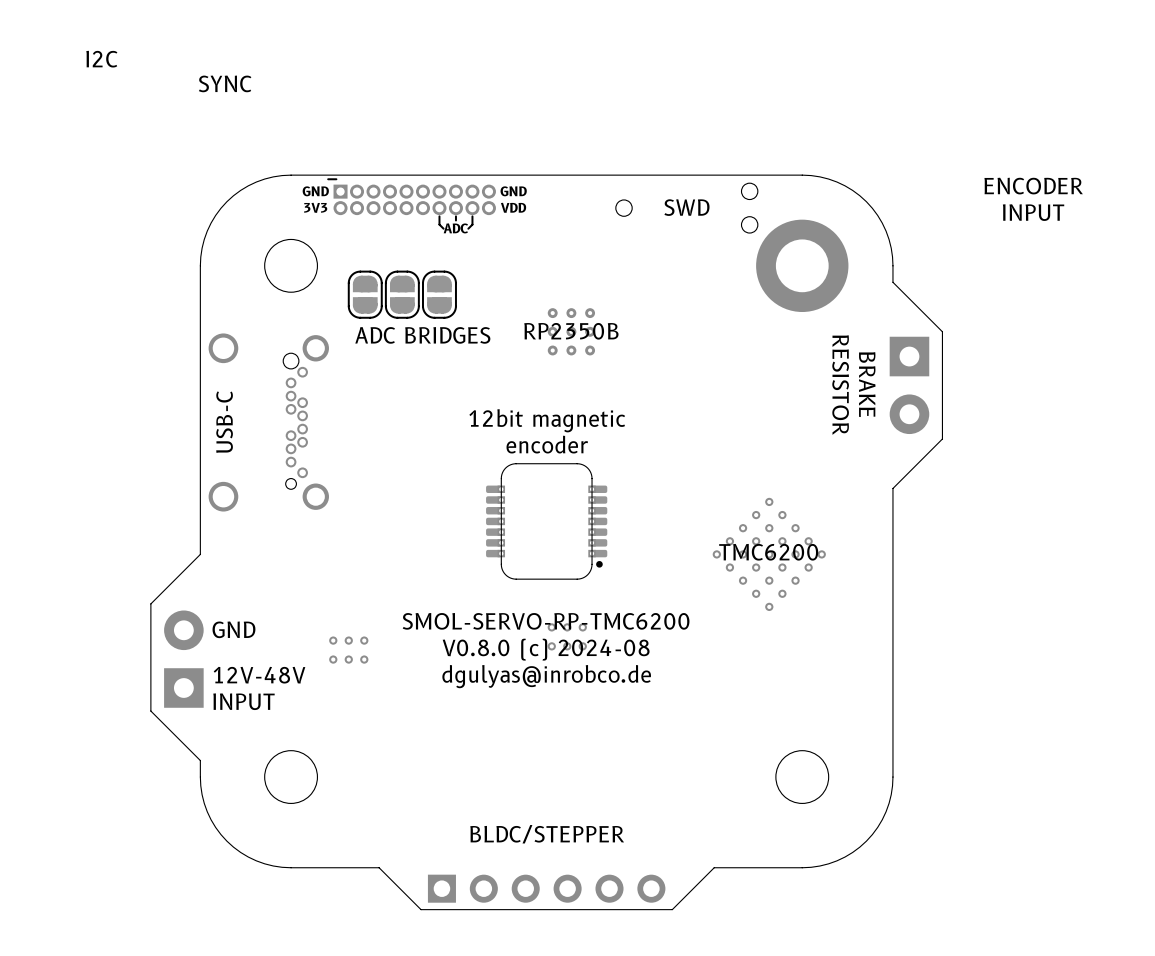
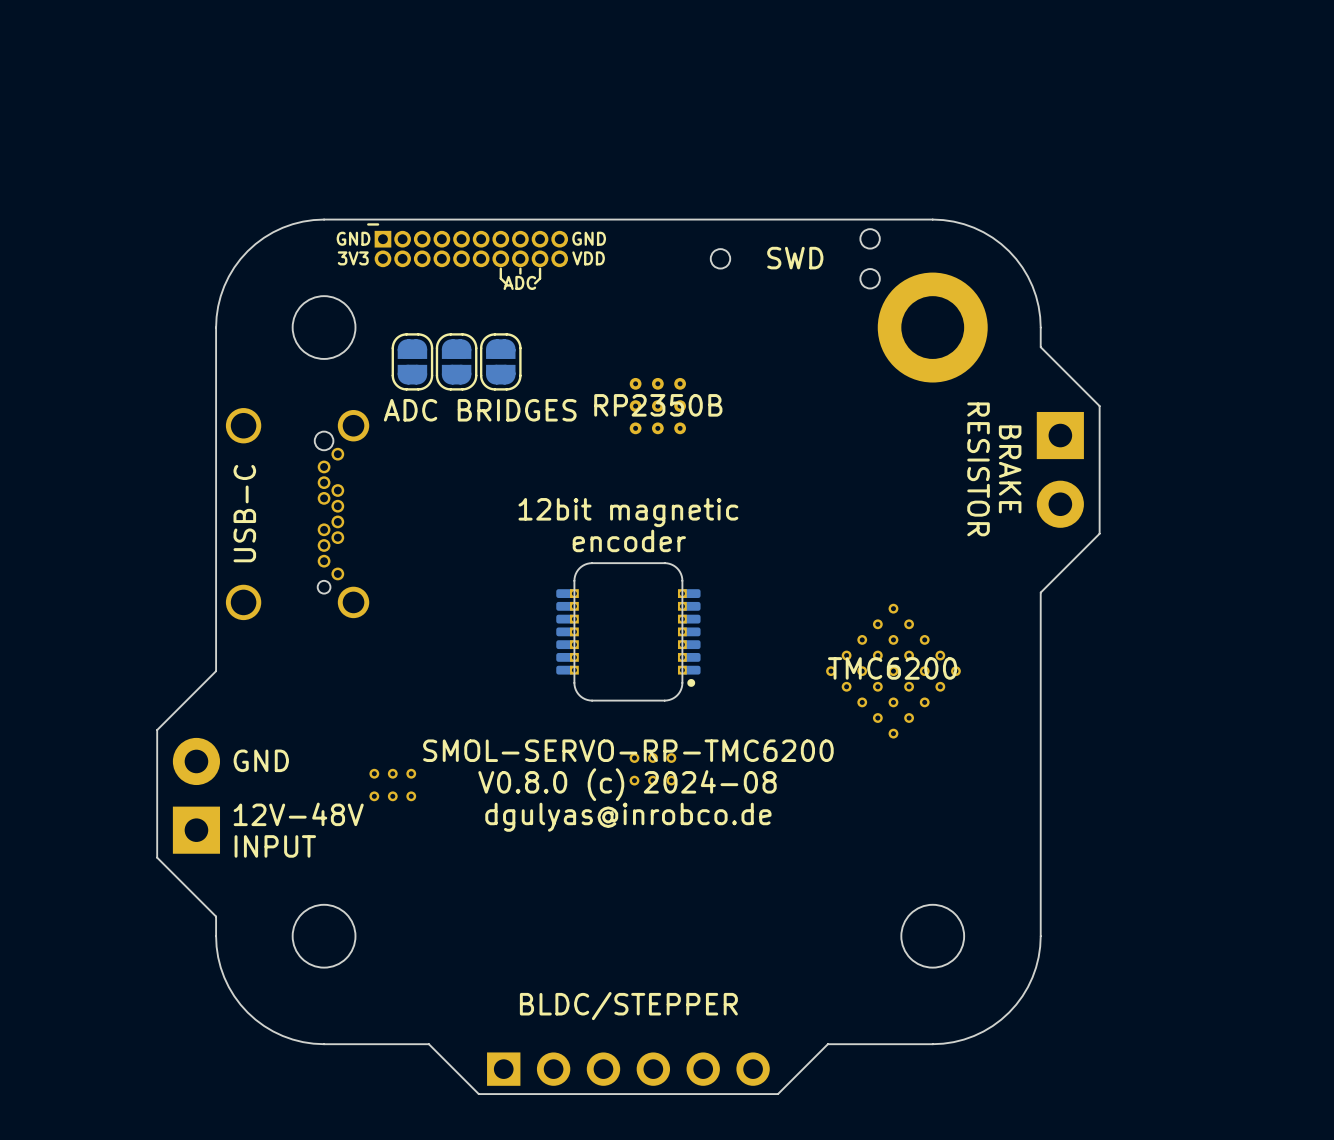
text: I2C (101, 59) -> none
text: SYNC (225, 83) -> none
text: ENCODER (1033, 186) -> none
text: INPUT (1033, 212) -> none

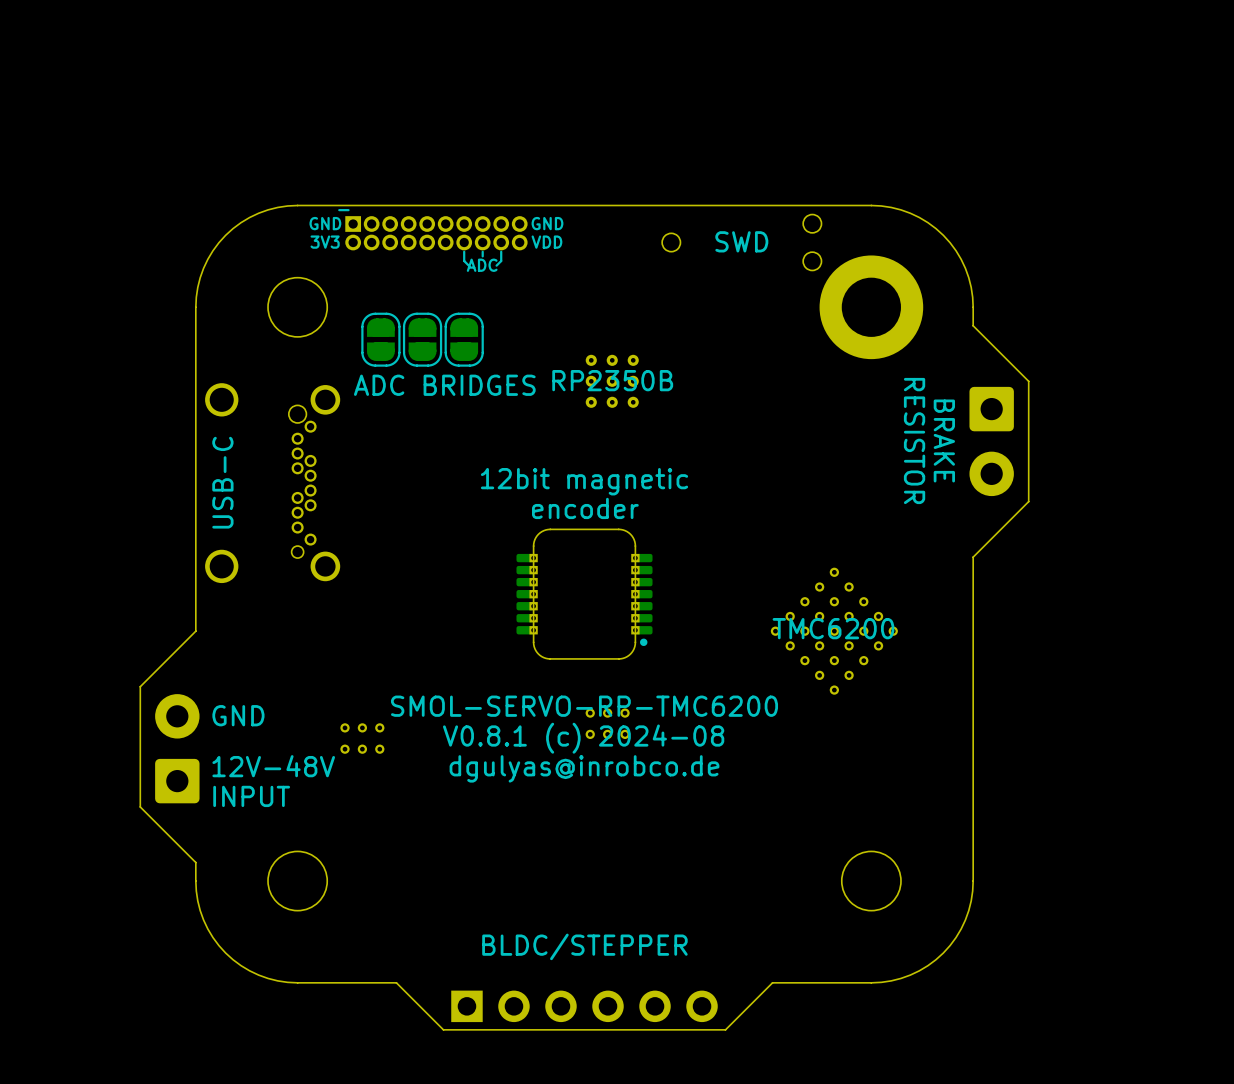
part footprint: [1036, 411, 1084, 528] -> [969, 386, 1014, 497]
part footprint: [172, 737, 221, 854] -> [155, 694, 200, 804]
text: V0.8.0 (c) 2024-08 (627, 784) -> V0.8.1 (c) 2024-08 (583, 738)

